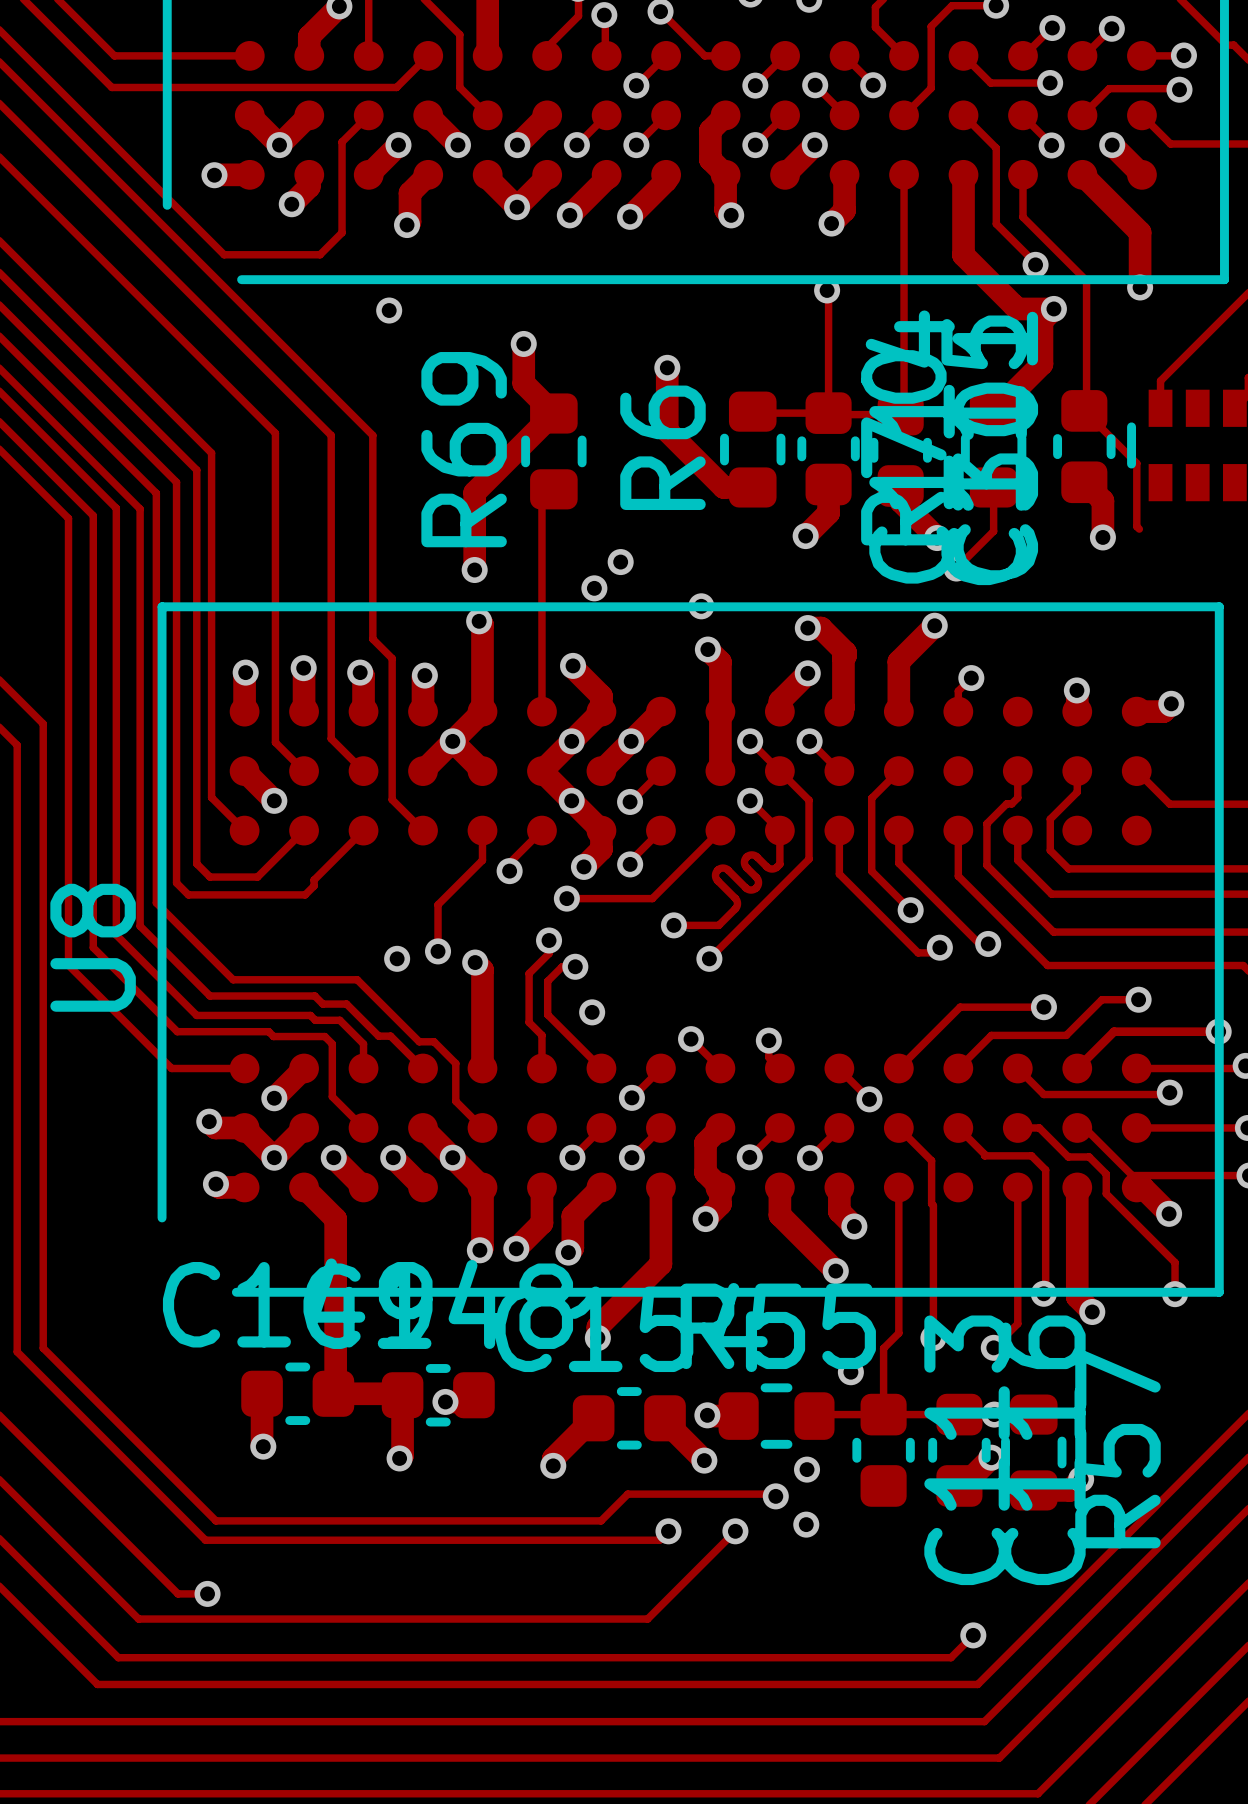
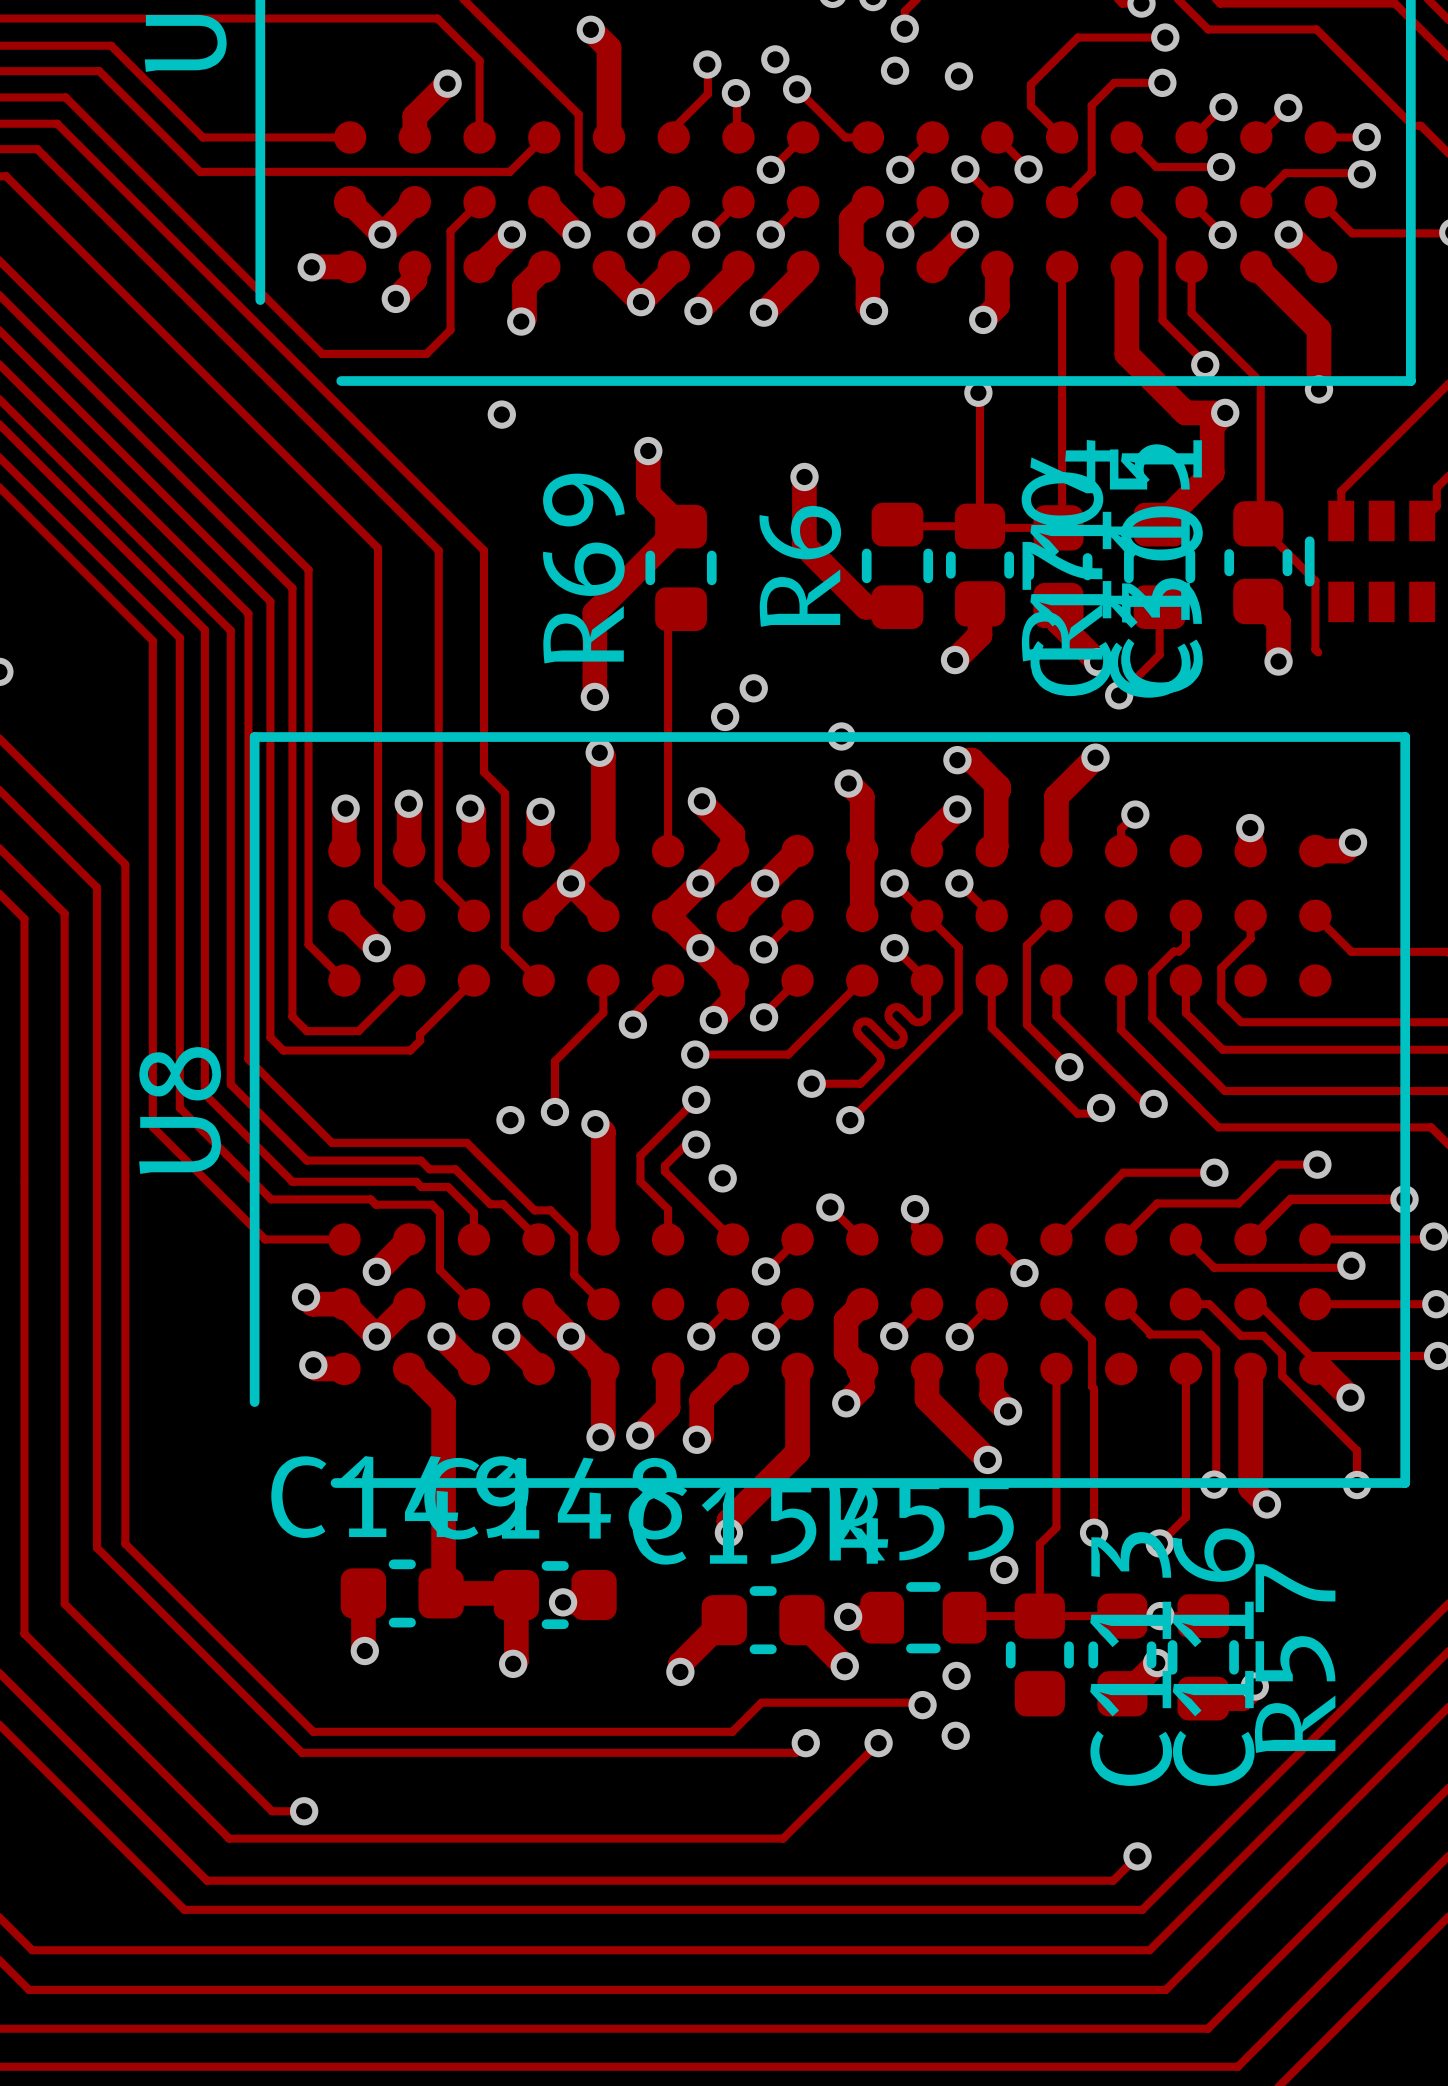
track: (549, 940) (549, 953) (529, 973) (529, 1022) (541, 1035) (541, 1040) -> (696, 1099) (640, 1155) (640, 1181) (668, 1209)
via position: (549, 940) -> (696, 1099)
track: (575, 966) (562, 966) (547, 981) (547, 1014) -> (696, 1144) (686, 1144) (664, 1165) (664, 1171) (674, 1180)
via position: (575, 966) -> (696, 1144)

